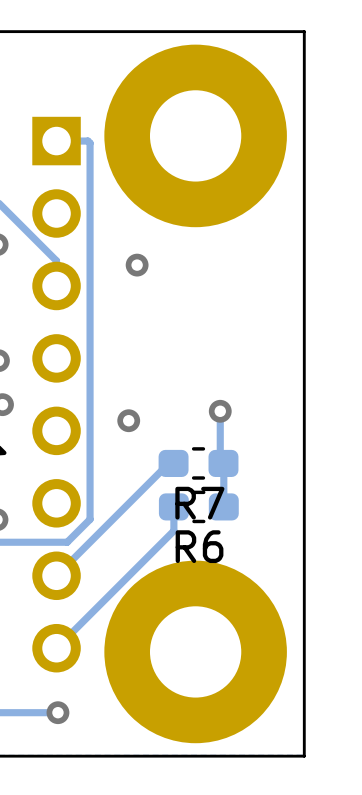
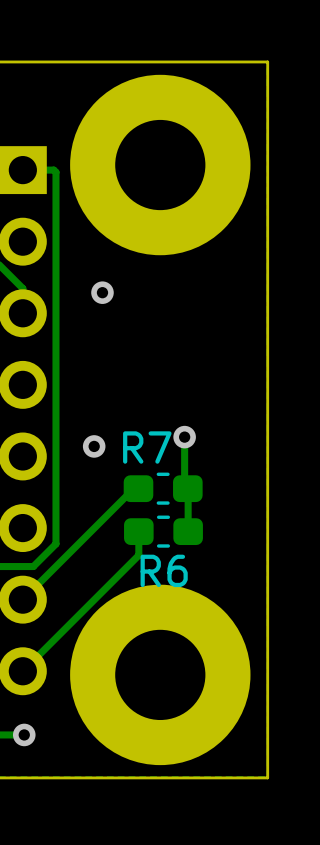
R7 name position: R7 (199, 503) -> R7 (147, 447)

